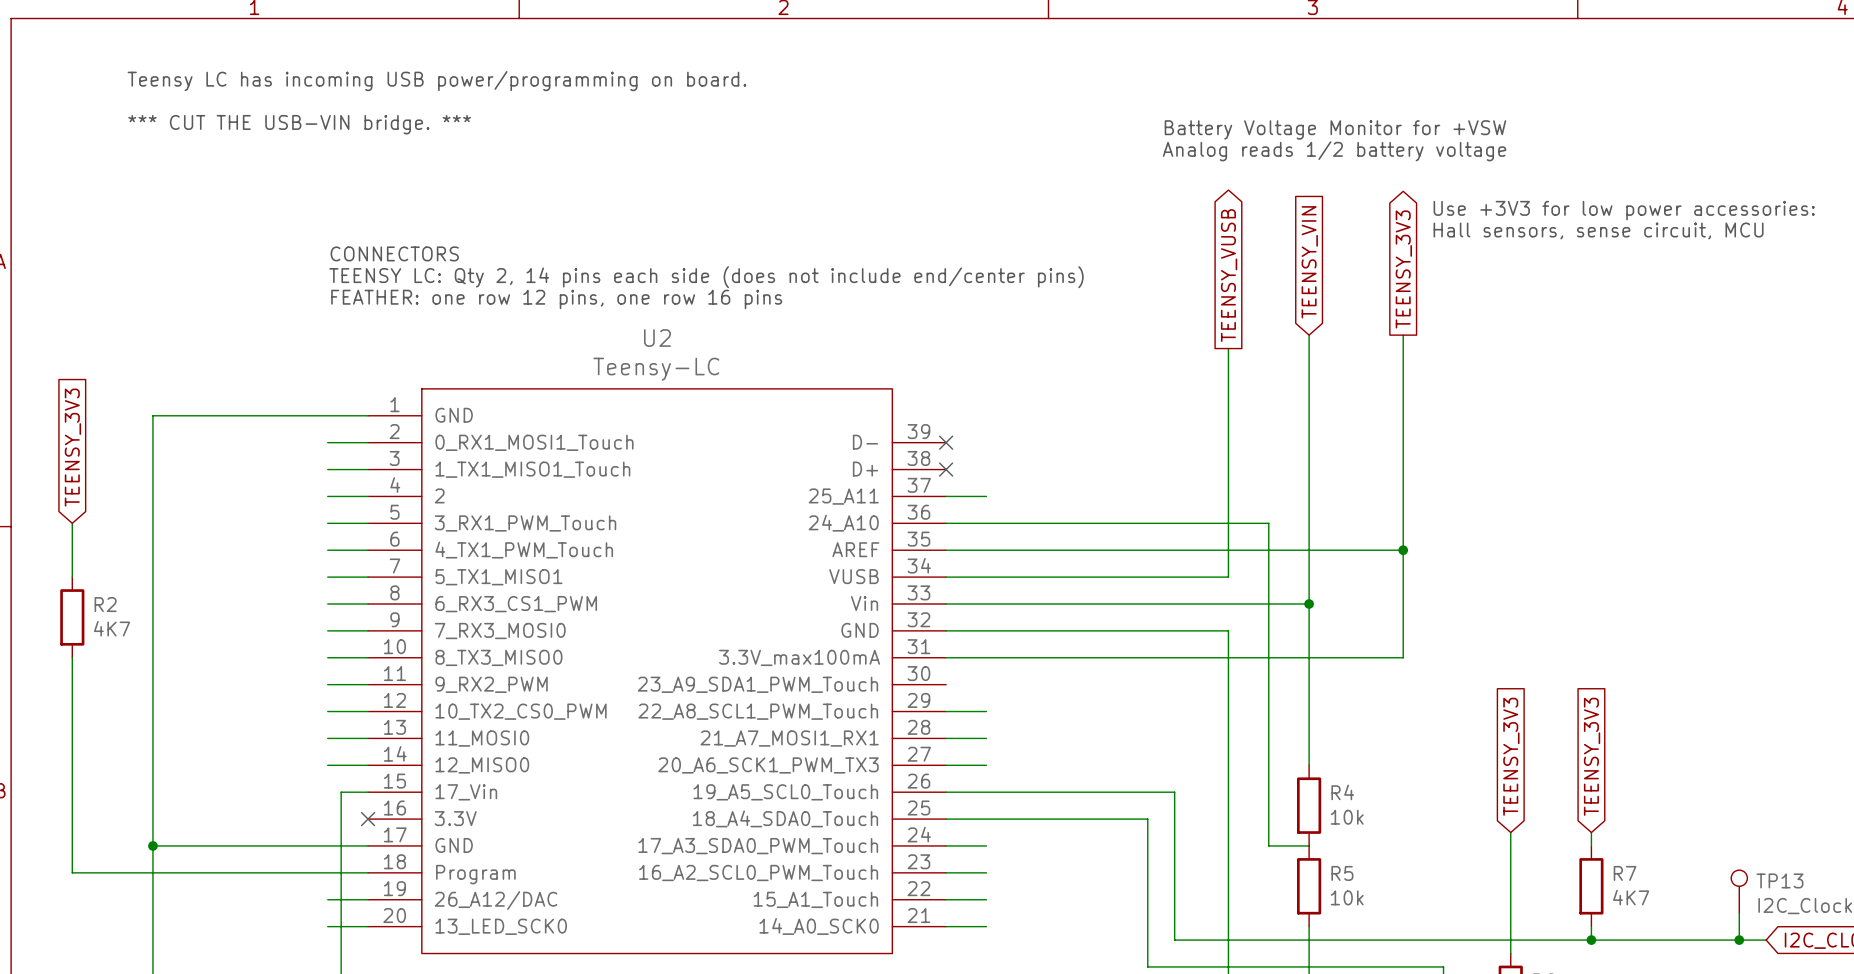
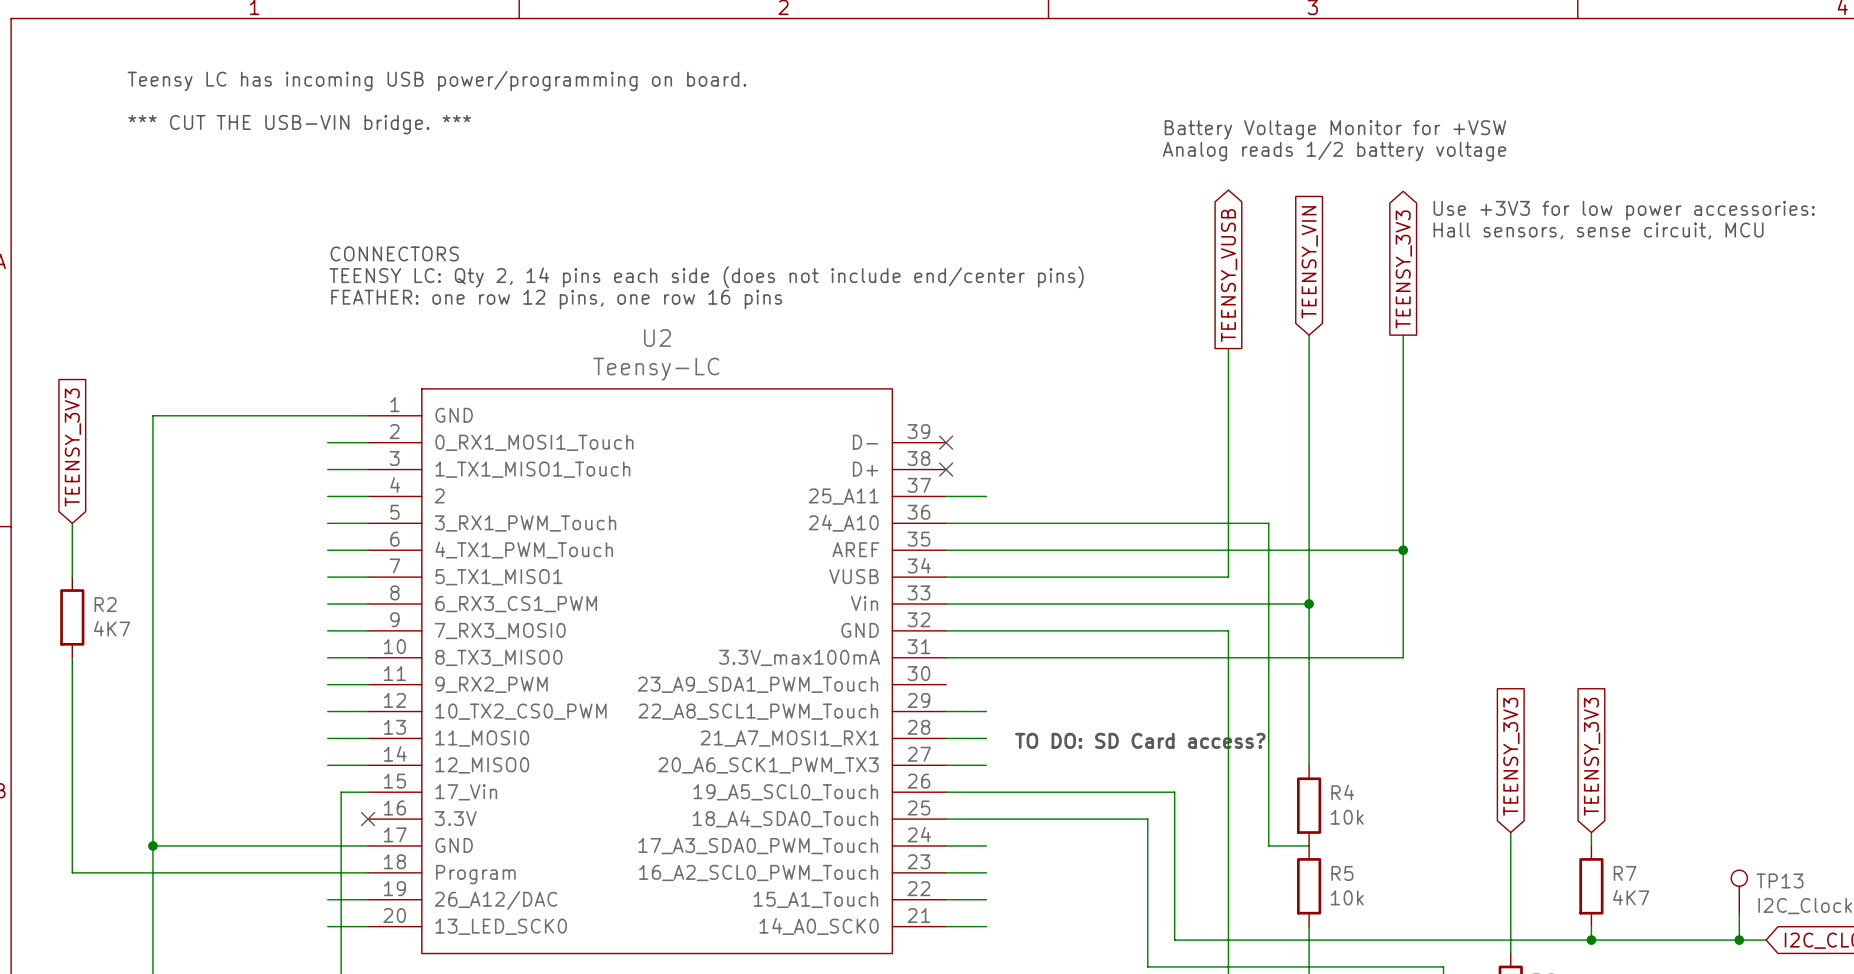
text: none -> TO DO: SD Card access? (1140, 740)

